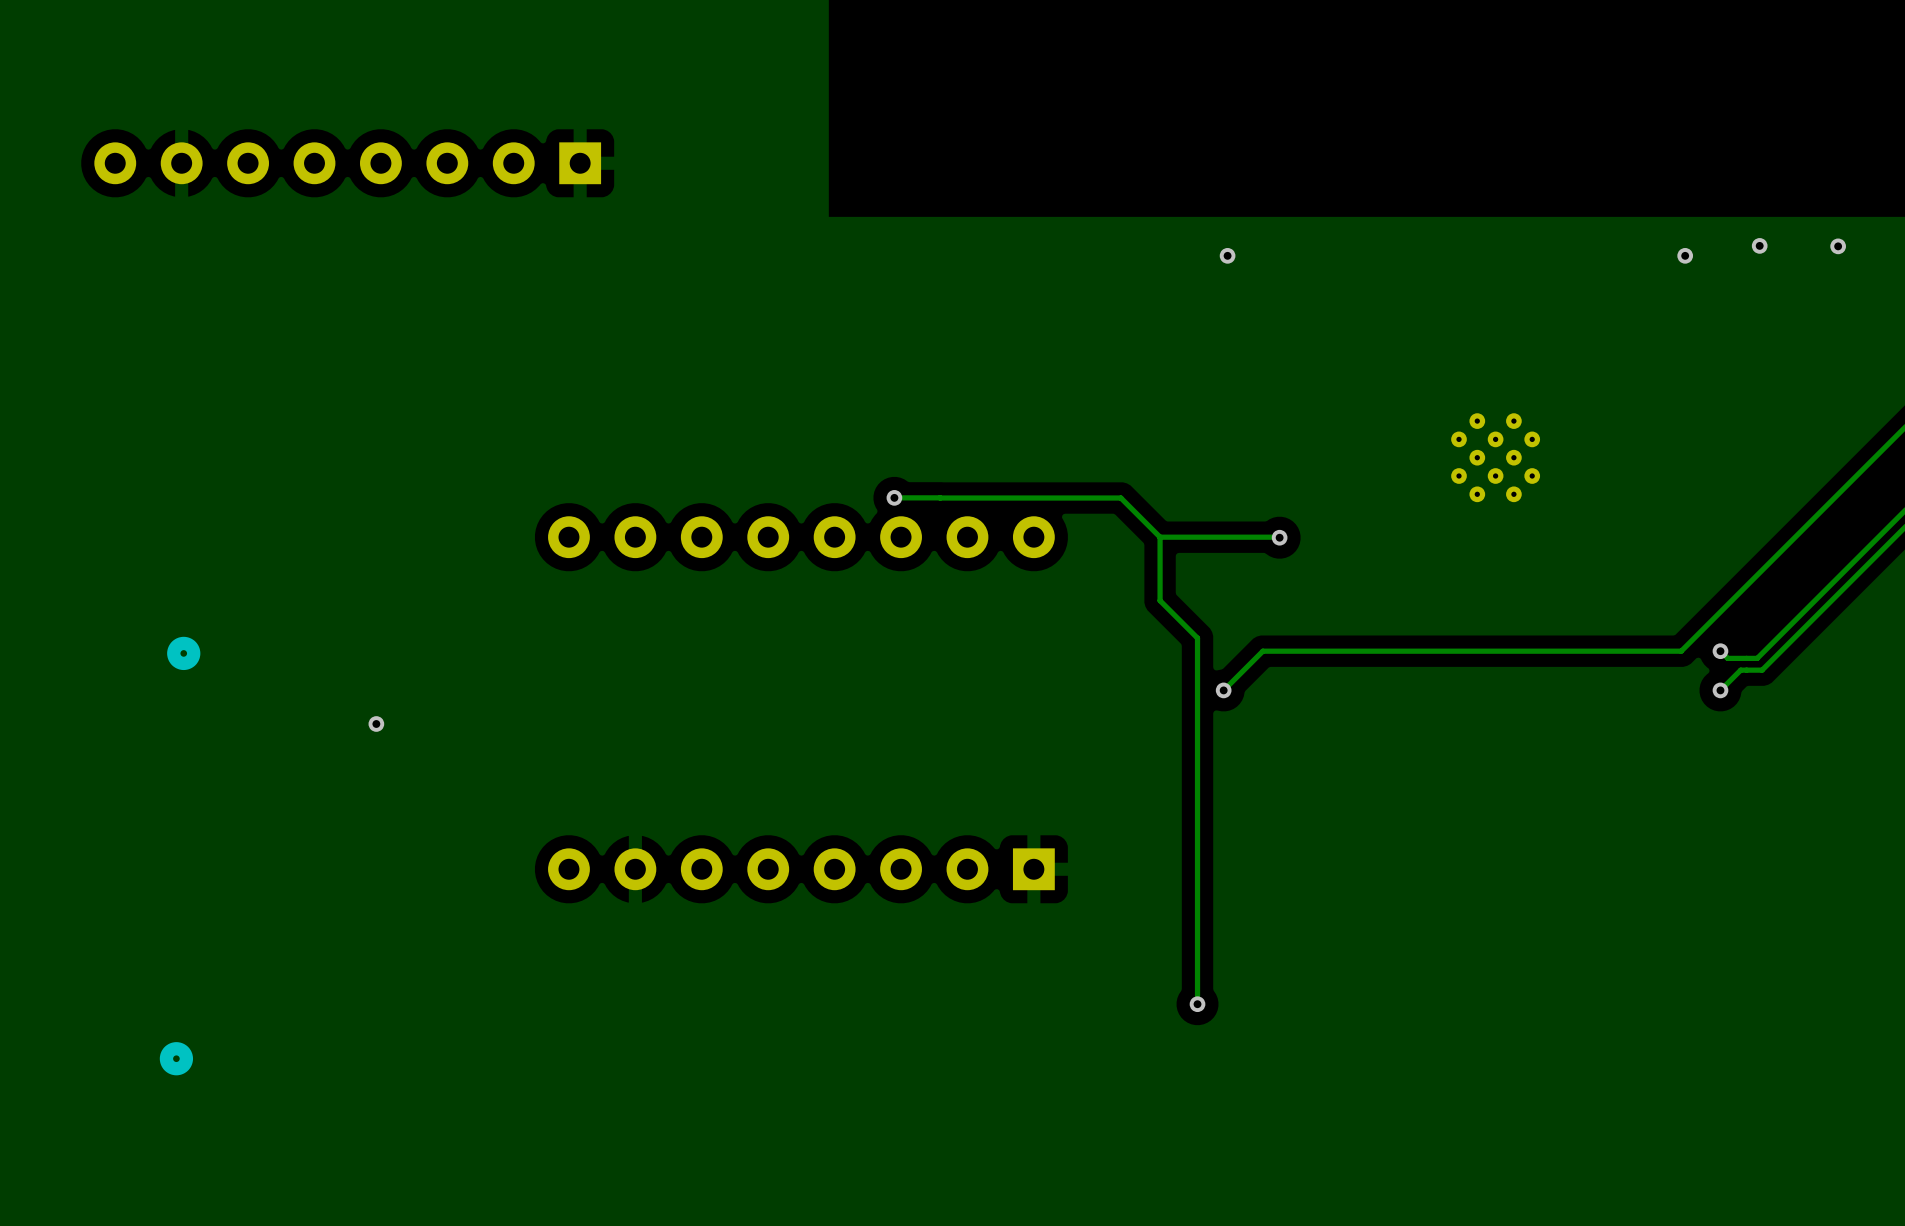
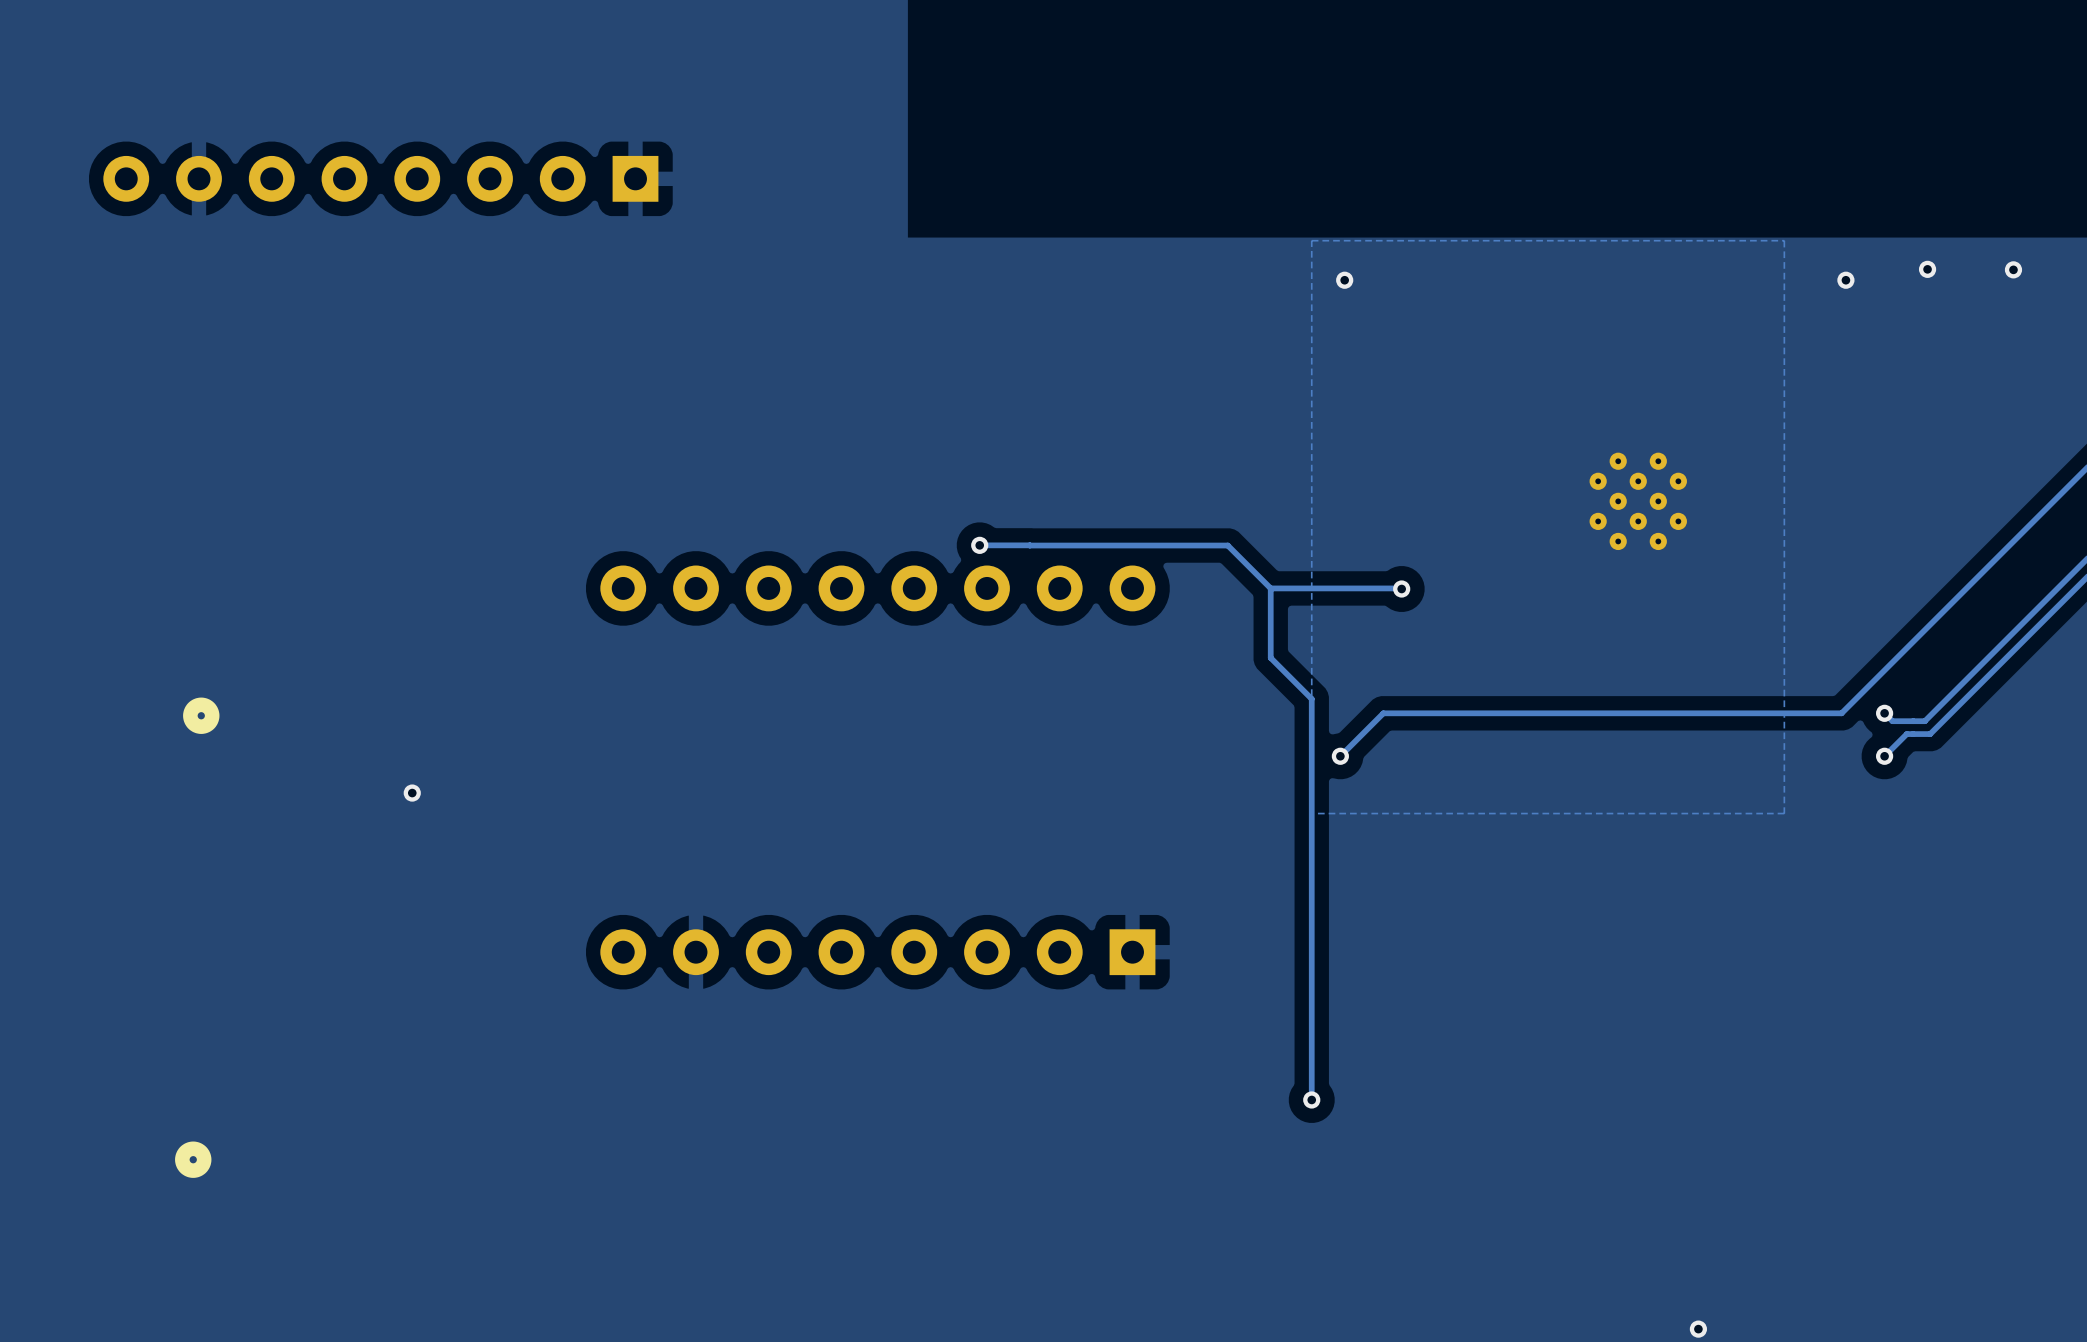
zone outline: none -> (1784, 240) (1311, 240) (1311, 813) (1784, 813) (1784, 240)
via: none -> (1698, 1329)

